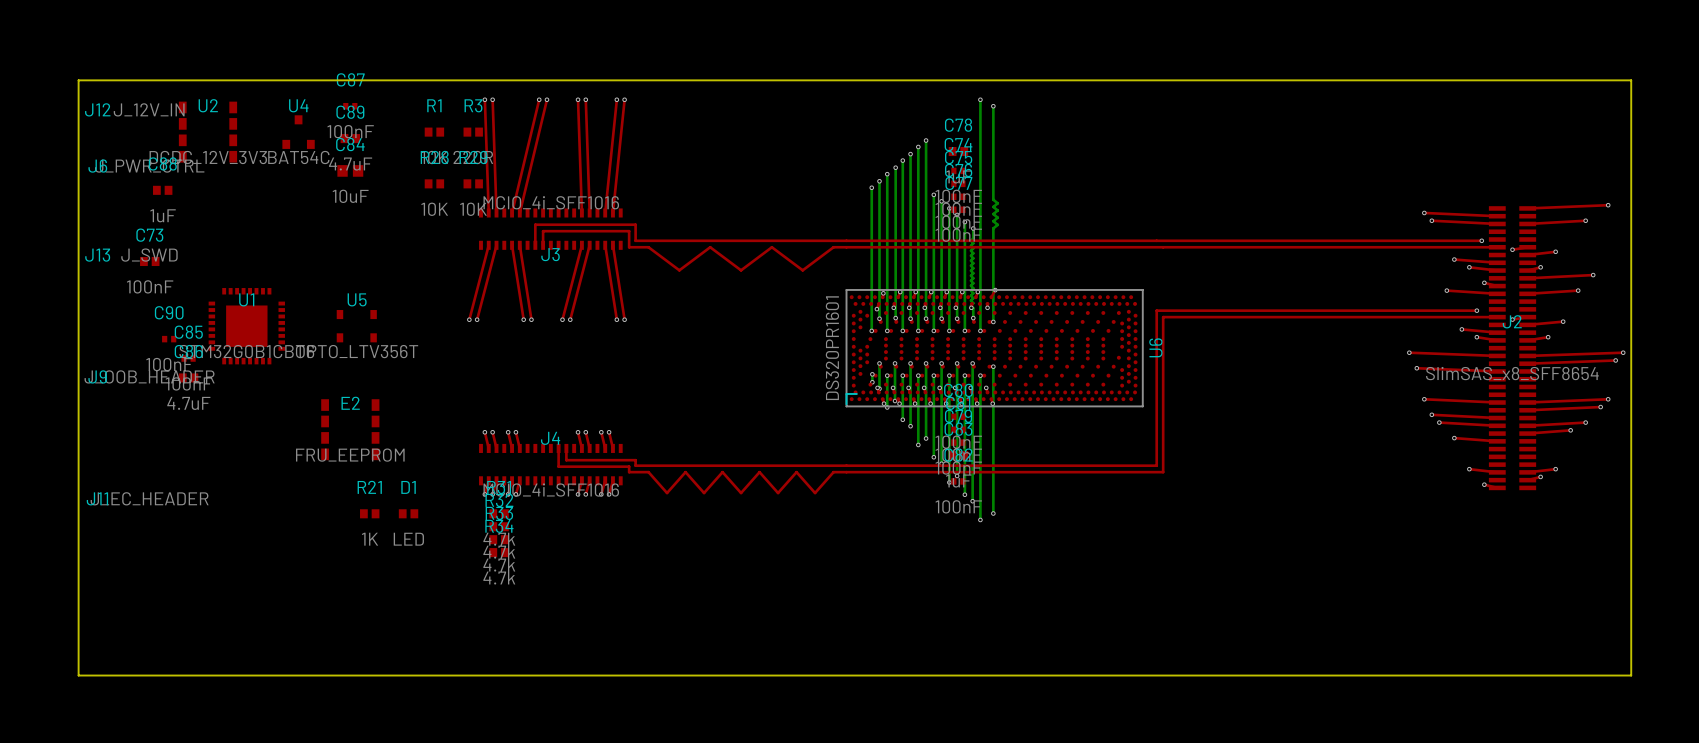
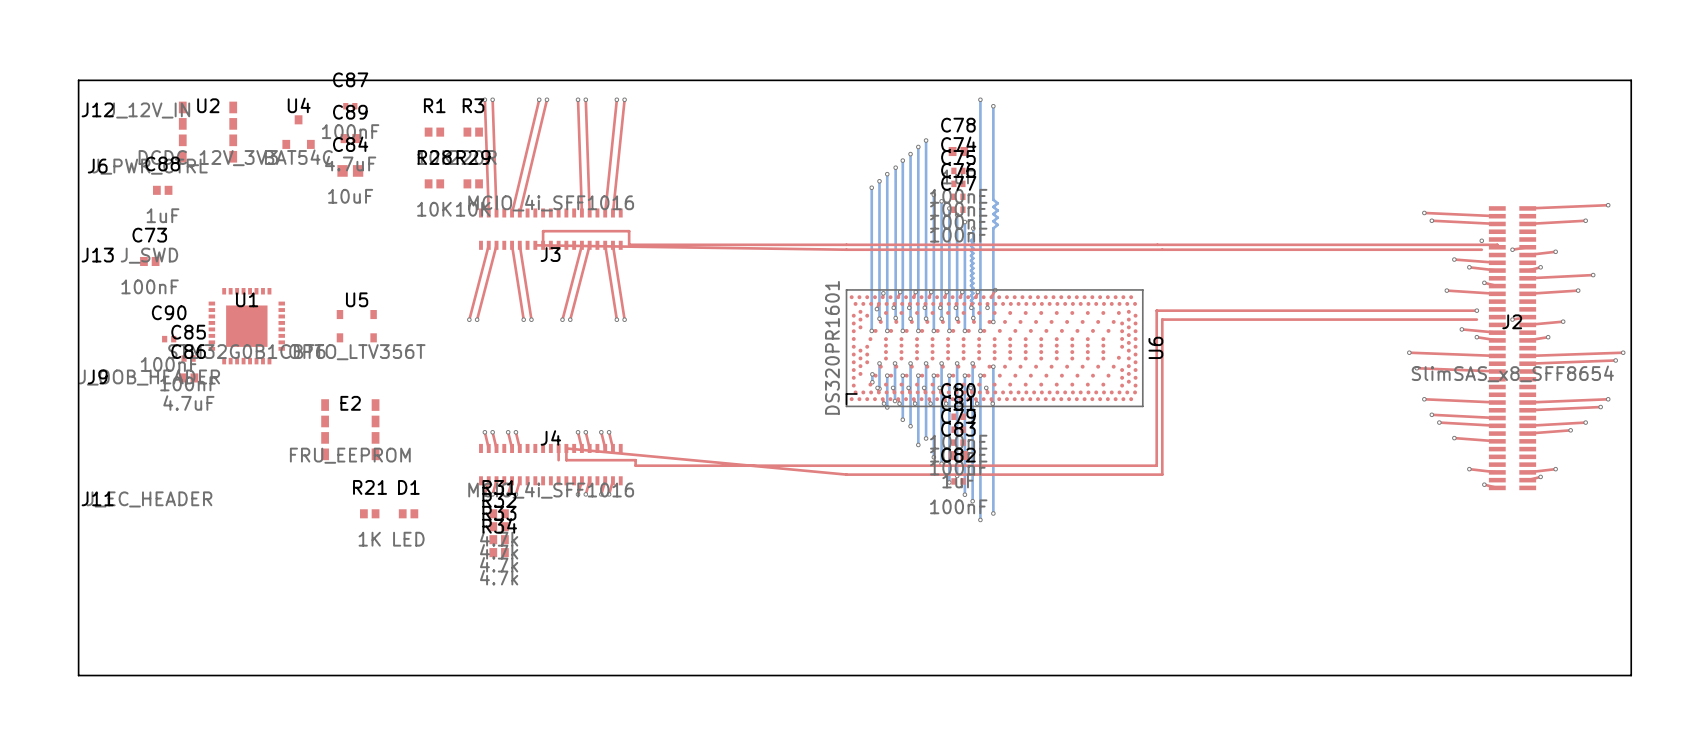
top track: (1481, 240) (635, 240) (635, 224) (535, 224) (535, 245) -> (1481, 249) (846, 249) (535, 245)
top track: (629, 244) (629, 247) (648, 247) (679, 270) (710, 247) (741, 270) (771, 247) (802, 270) (833, 247) (1497, 247) -> (629, 244) (1497, 244) (1497, 247)
top track: (1497, 317) (1163, 317) (1163, 472) (833, 472) (815, 493) (796, 472) (778, 493) (759, 472) (741, 493) (722, 472) (704, 493) (685, 472) (667, 493) (648, 472) (629, 472) (629, 466) (558, 466) (558, 460) -> none
top track: none -> (1476, 319) (1162, 319) (1162, 474) (846, 474) (566, 448)

